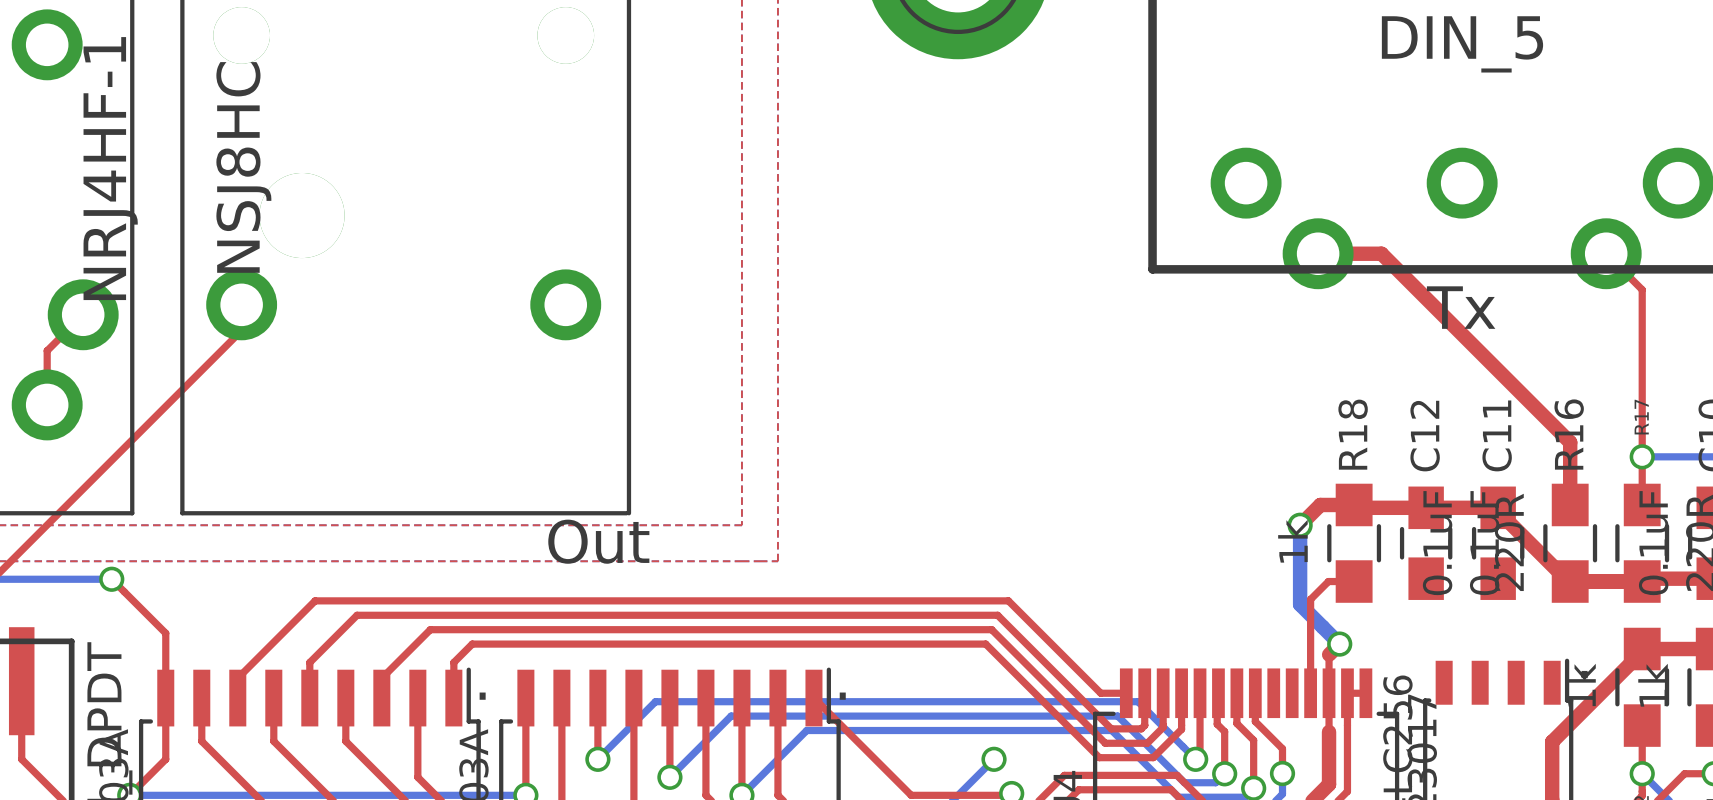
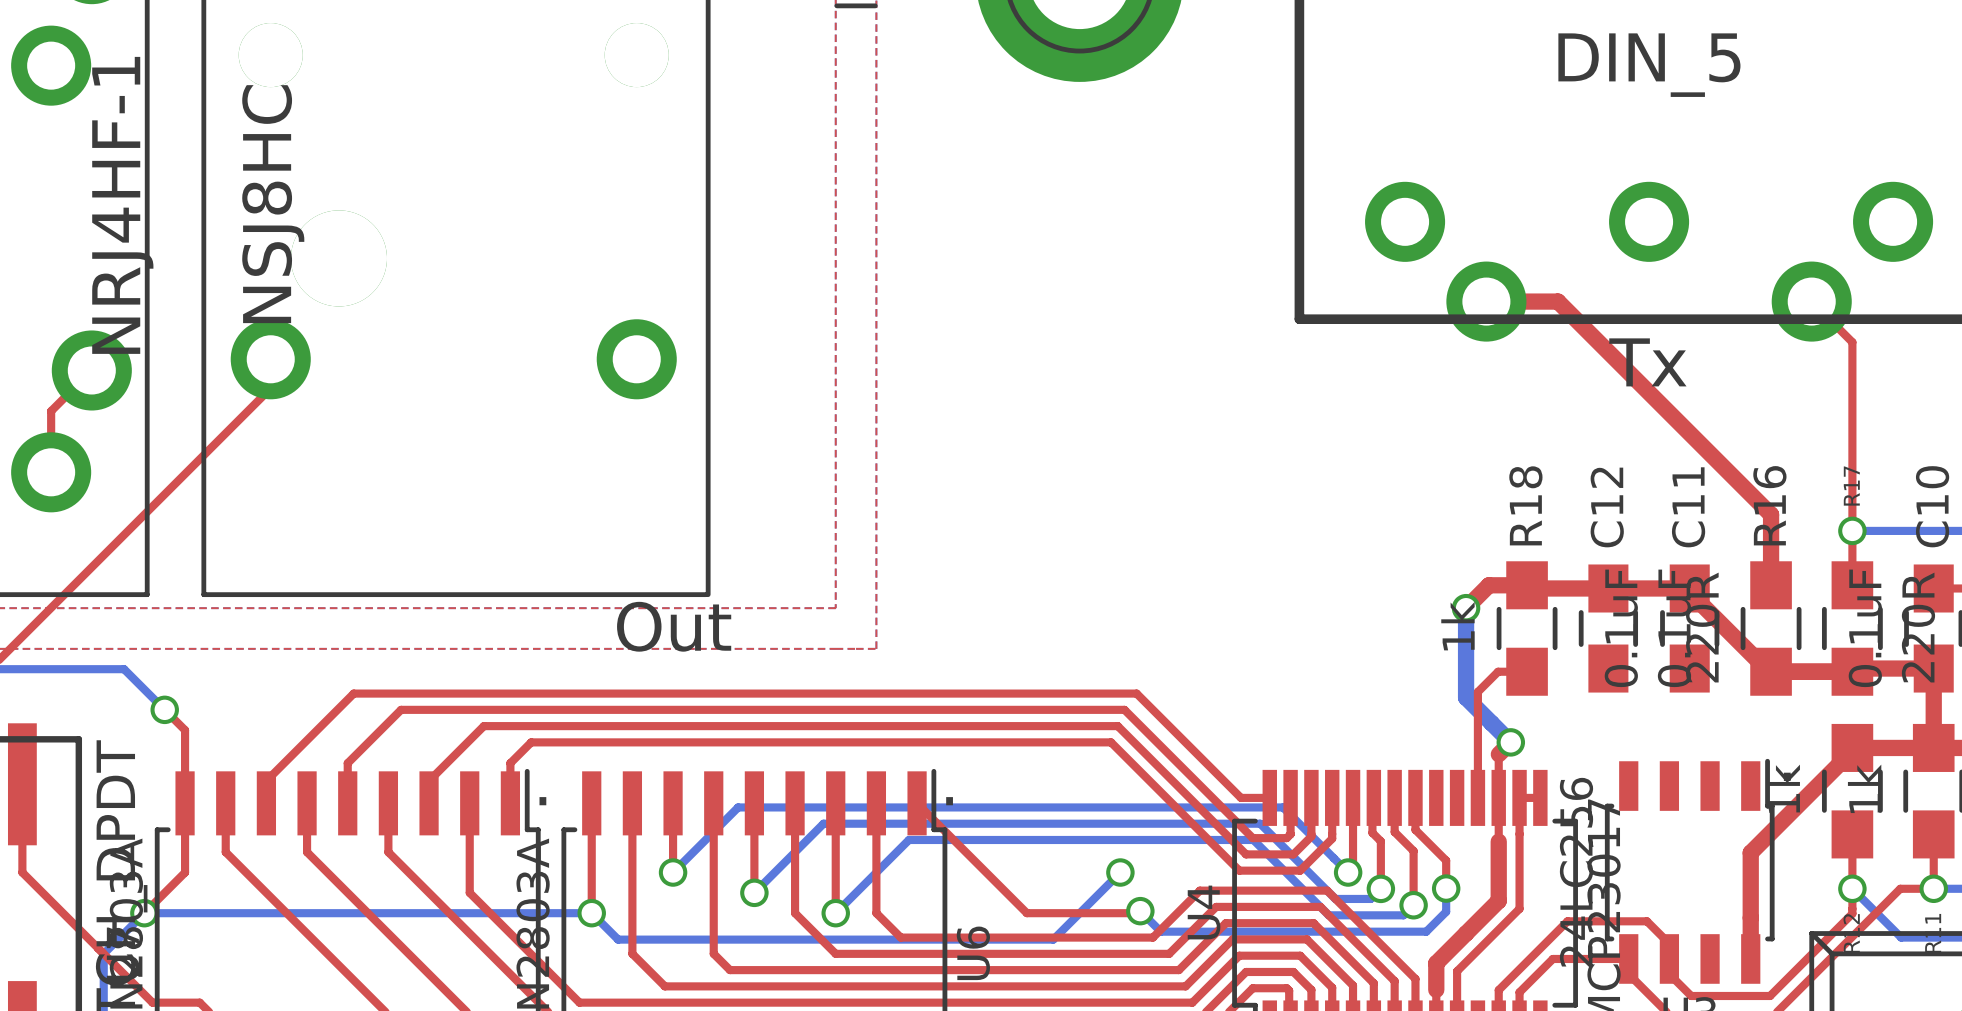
top track: (111, 579) (147, 615) -> none
bottom track: none -> (124, 669) (164, 709)
via position: (111, 579) -> (164, 709)

